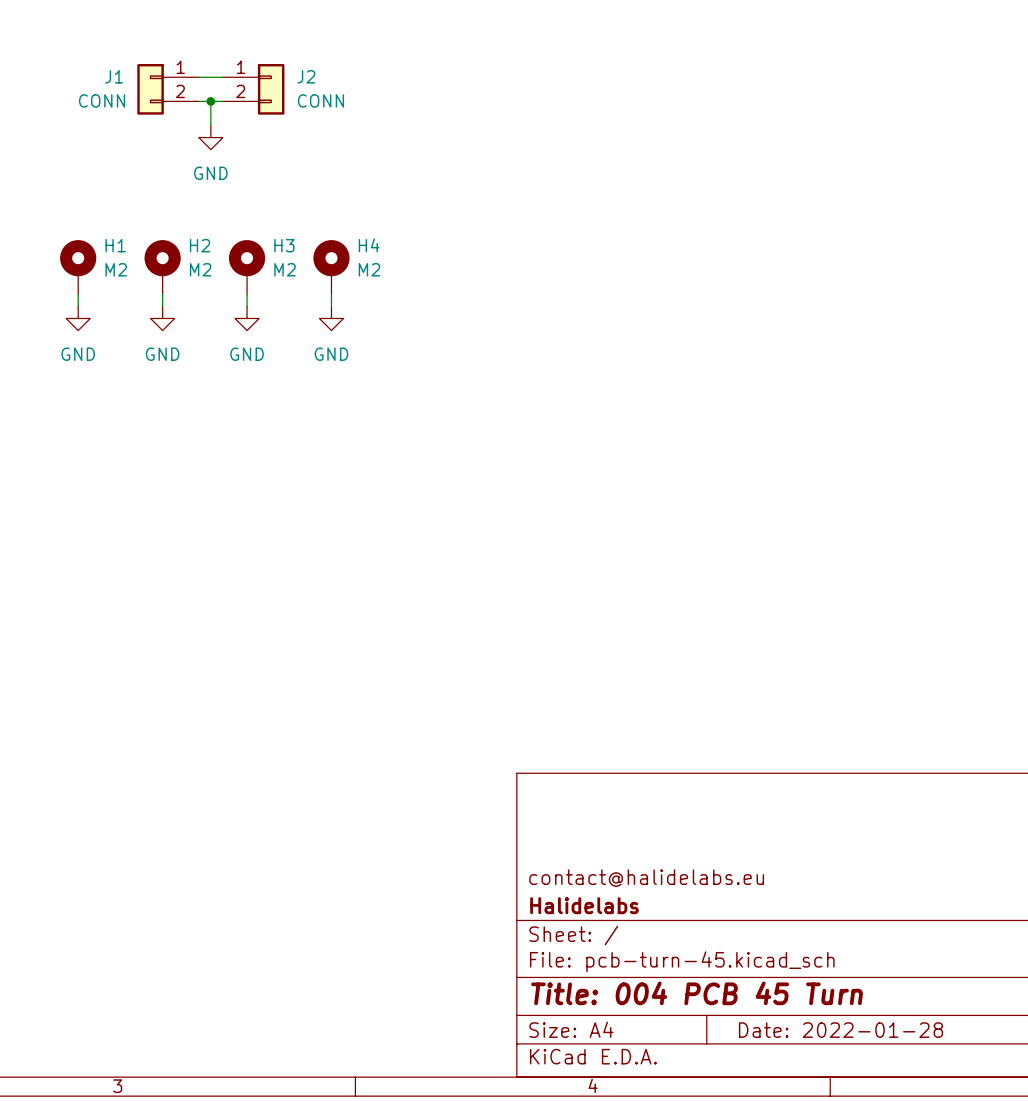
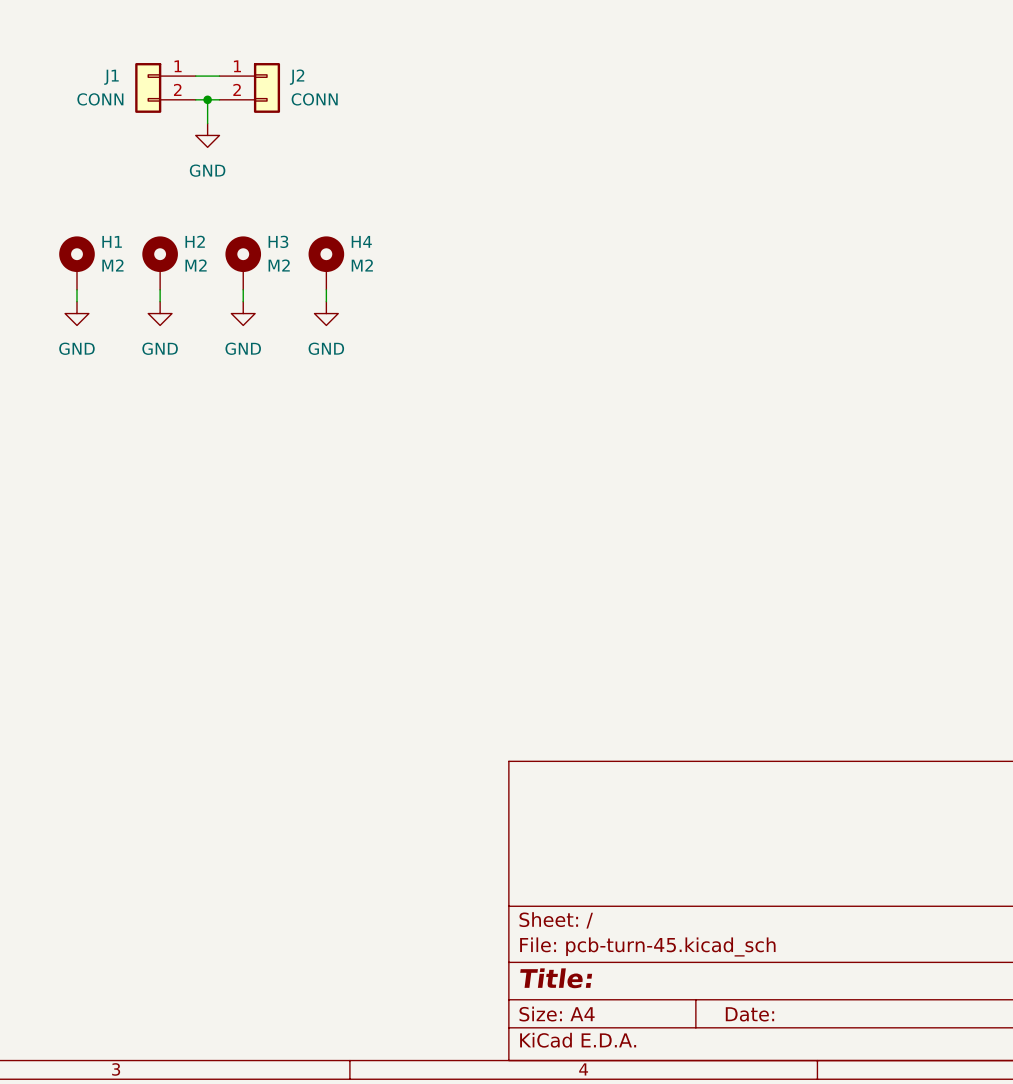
title block: contact@halidelabs.eu (646, 878) -> none
title block: Halidelabs (584, 905) -> none
title block: Title: 004 PCB 45 Turn (697, 993) -> Title: (556, 978)
title block: Date: 2022-01-28 (841, 1030) -> Date: (749, 1014)

